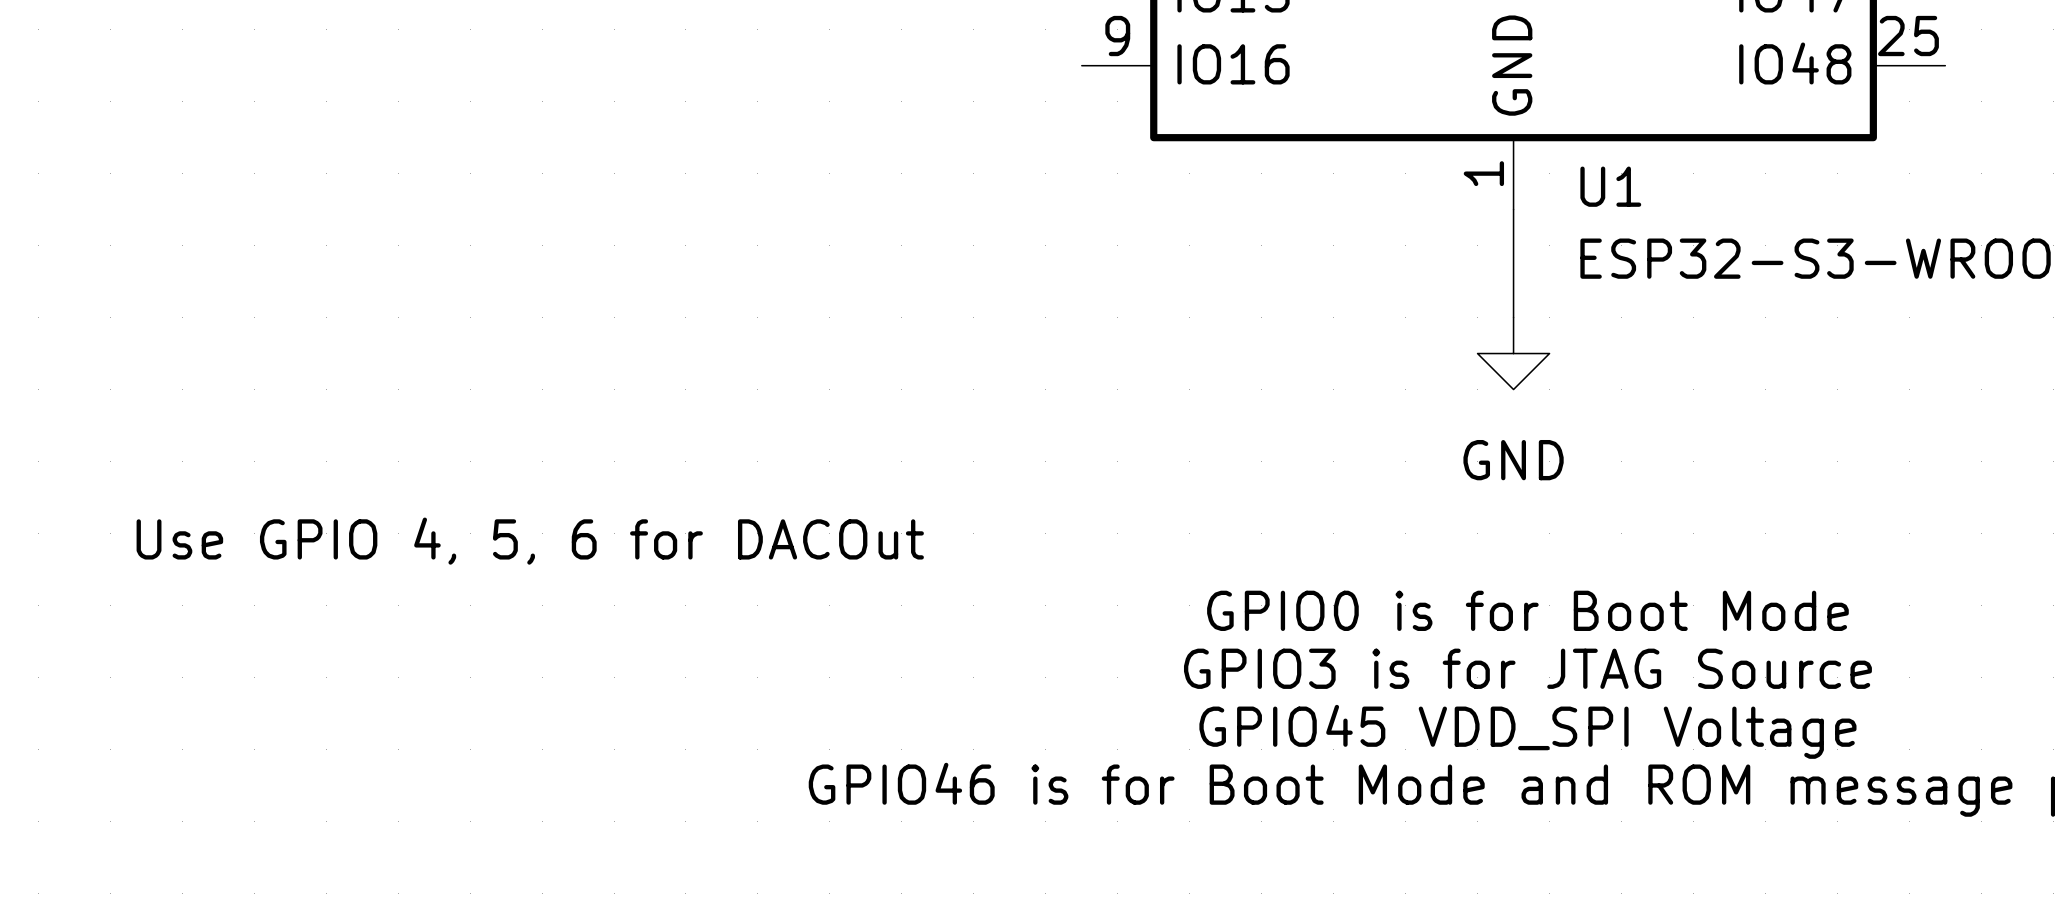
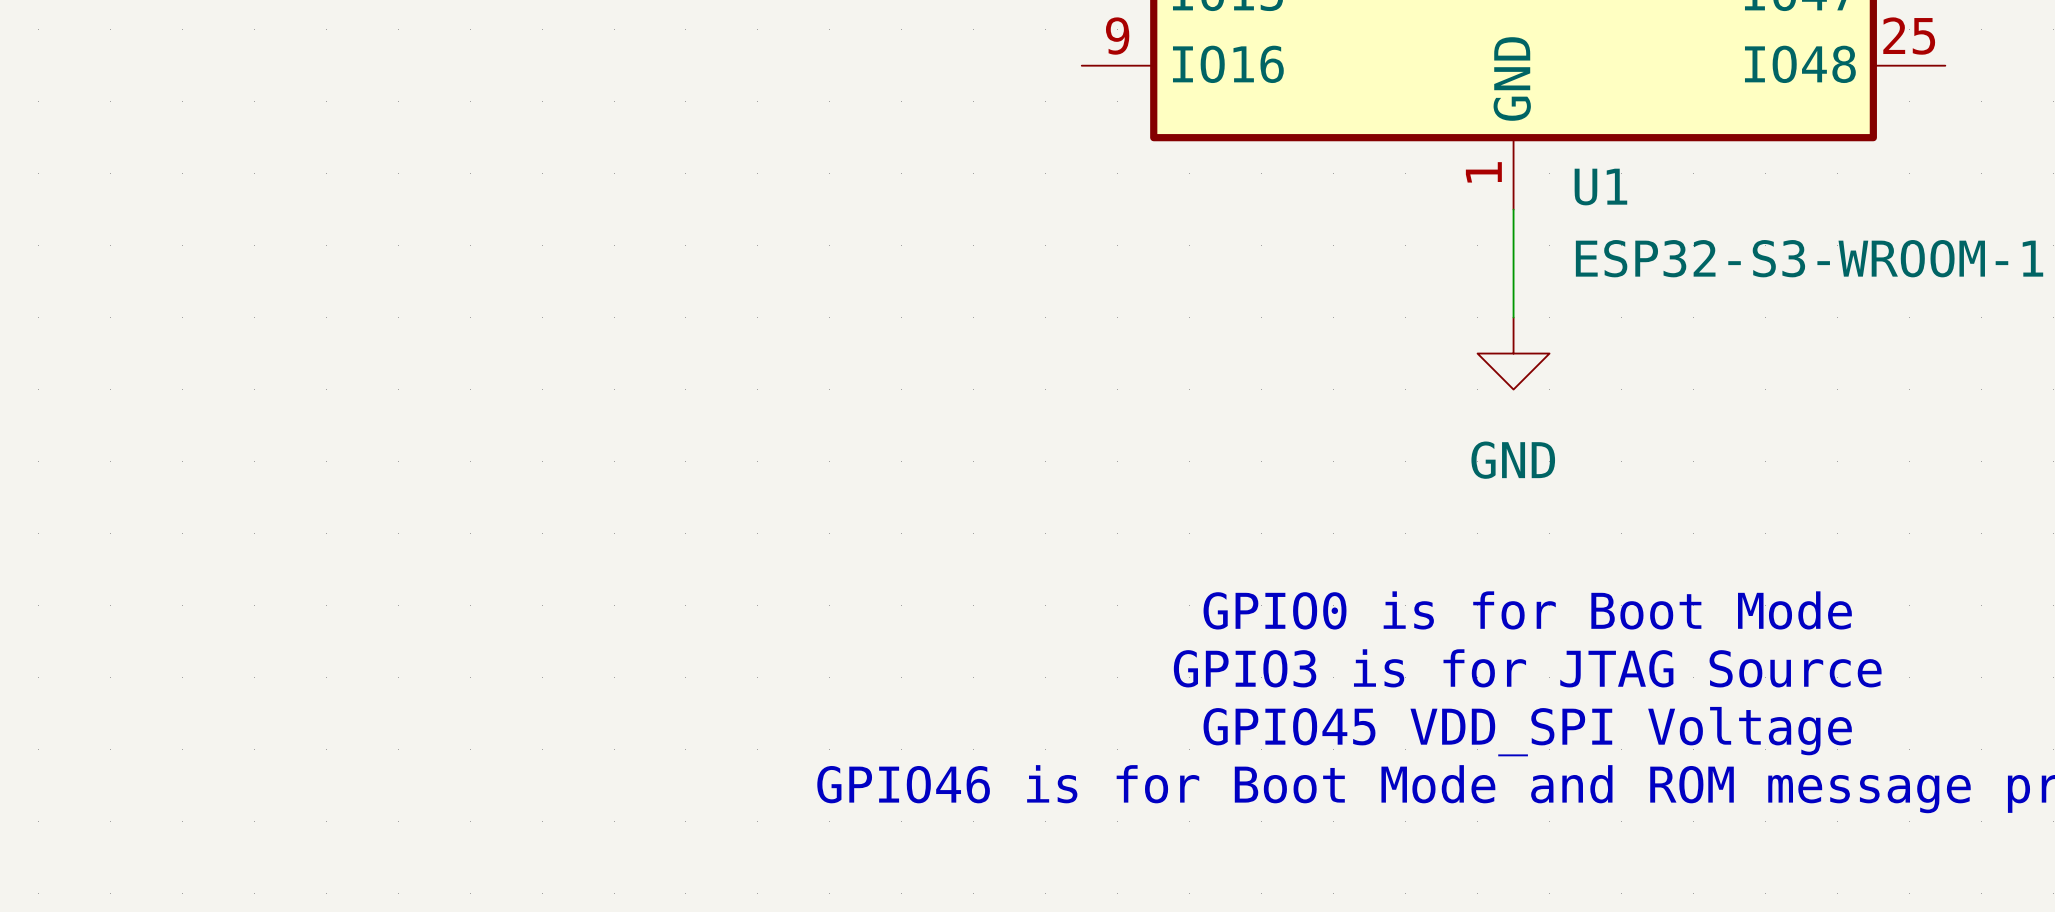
text: Use GPIO 4, 5, 6 for DACOut (530, 541) -> none

